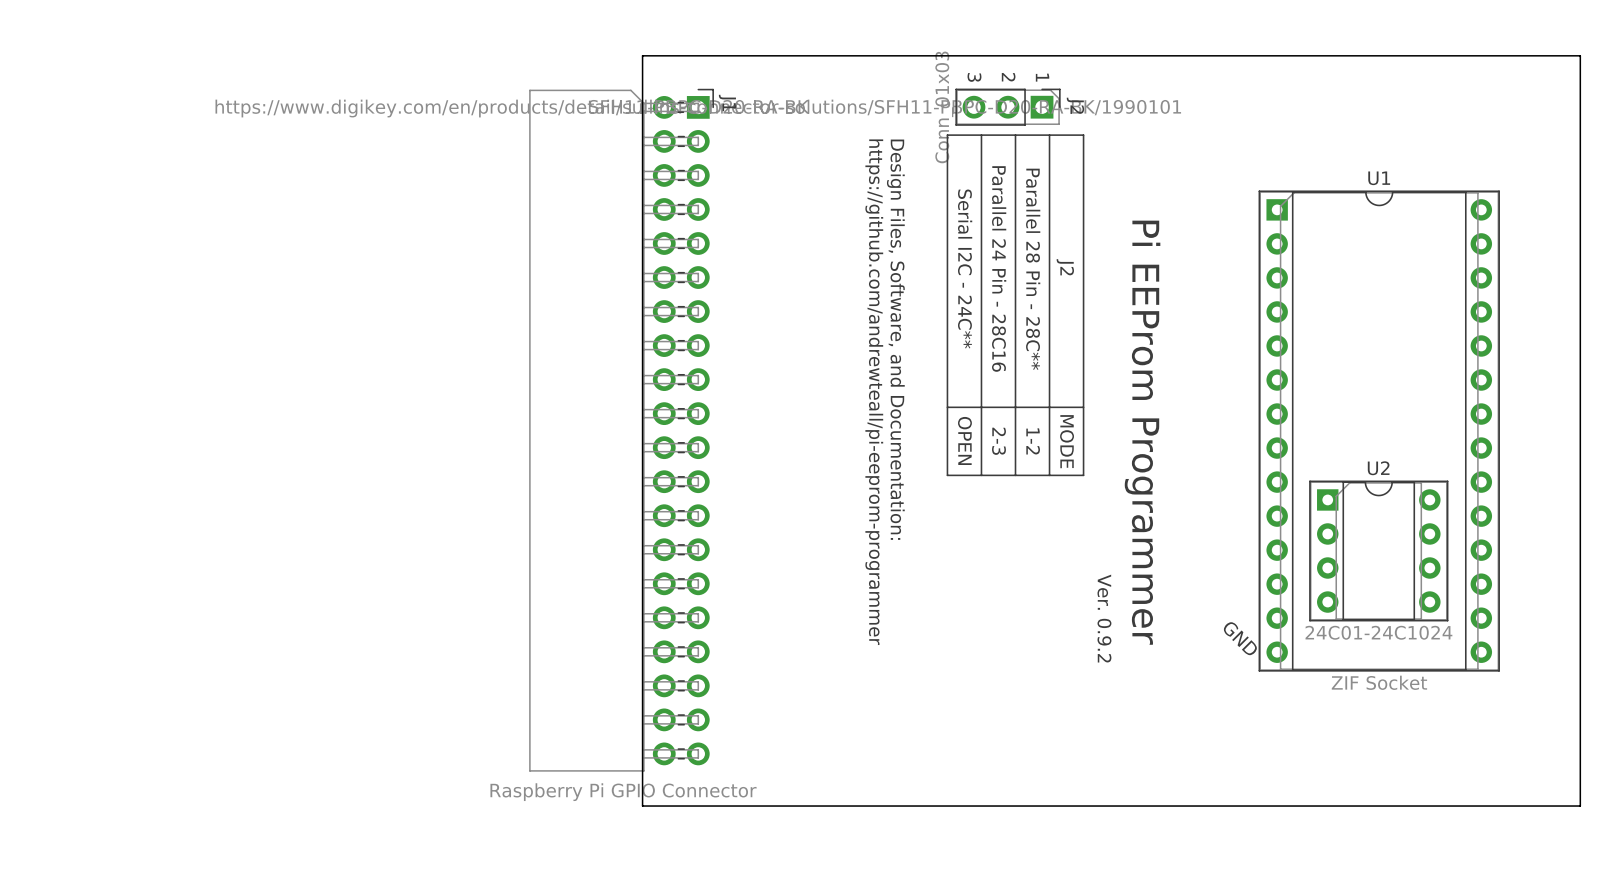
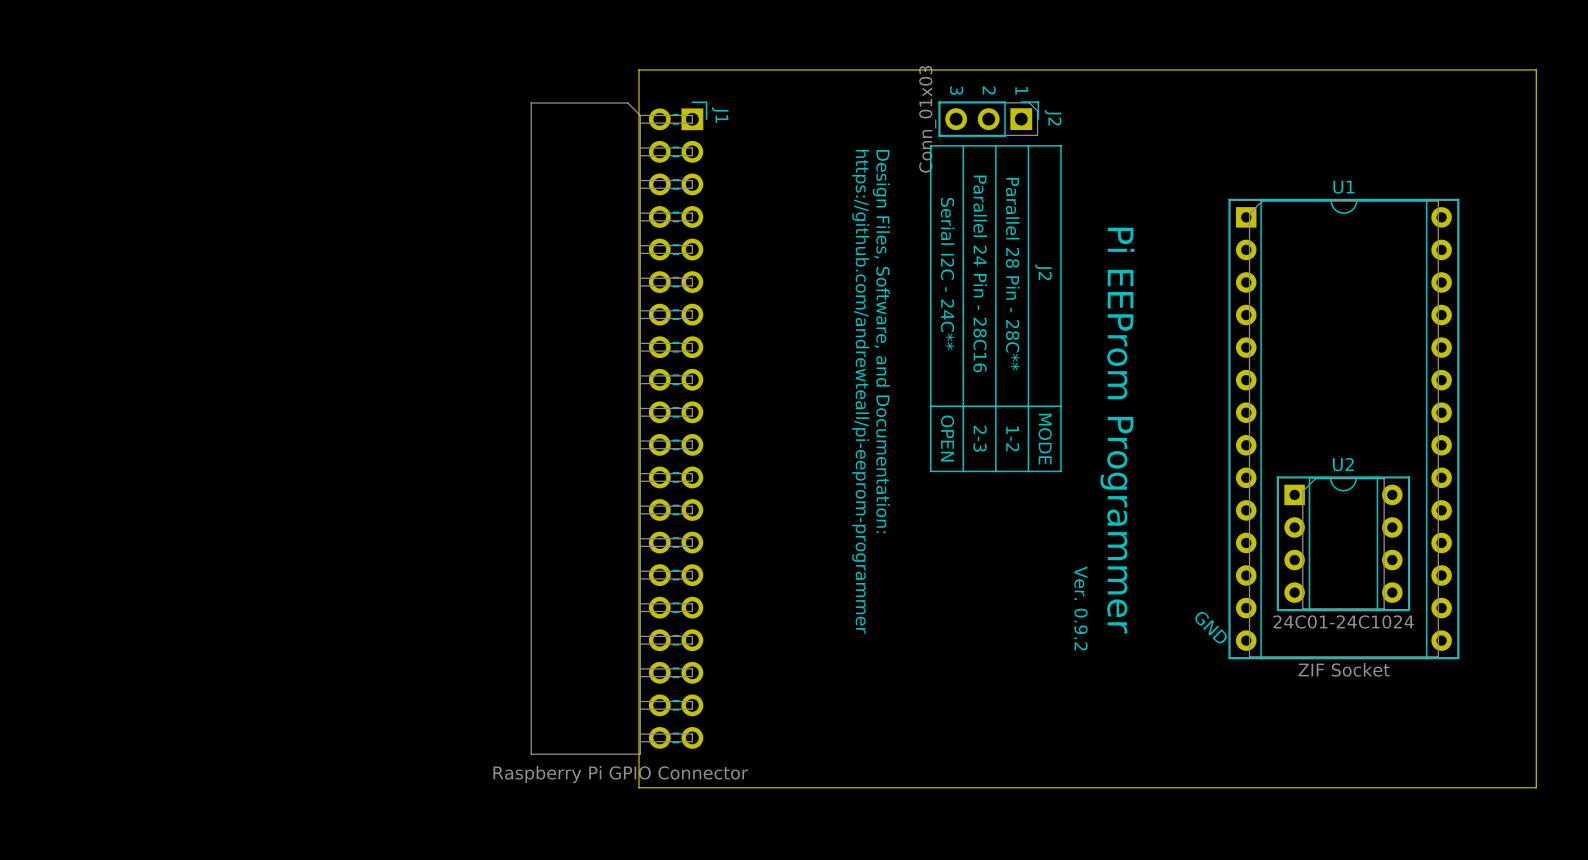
J1 footprint: [529, 88, 714, 772] -> [530, 101, 708, 755]

